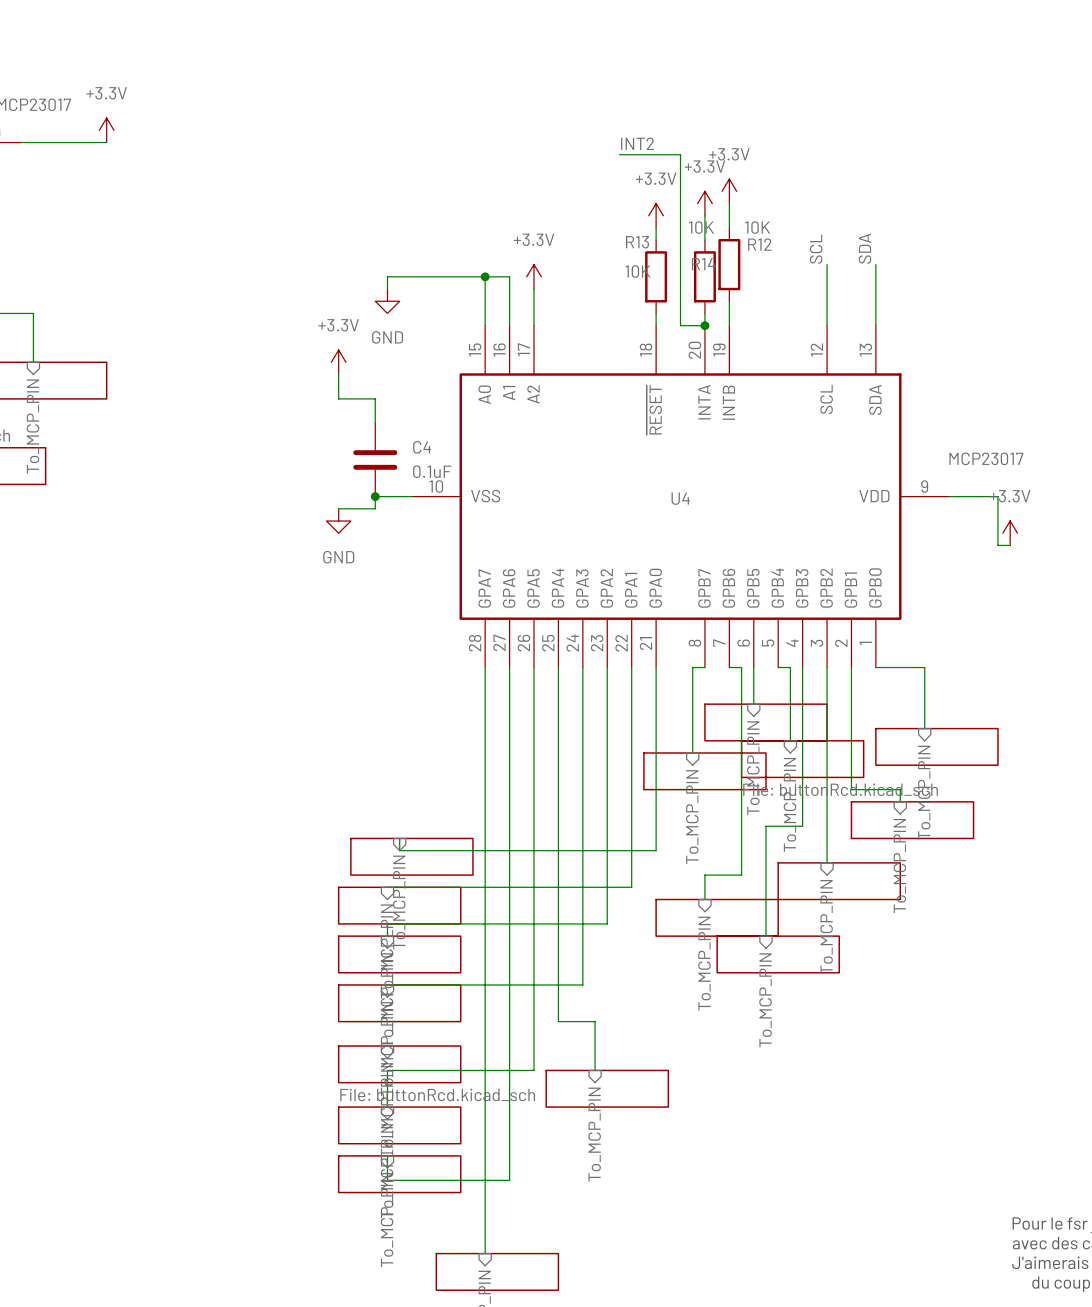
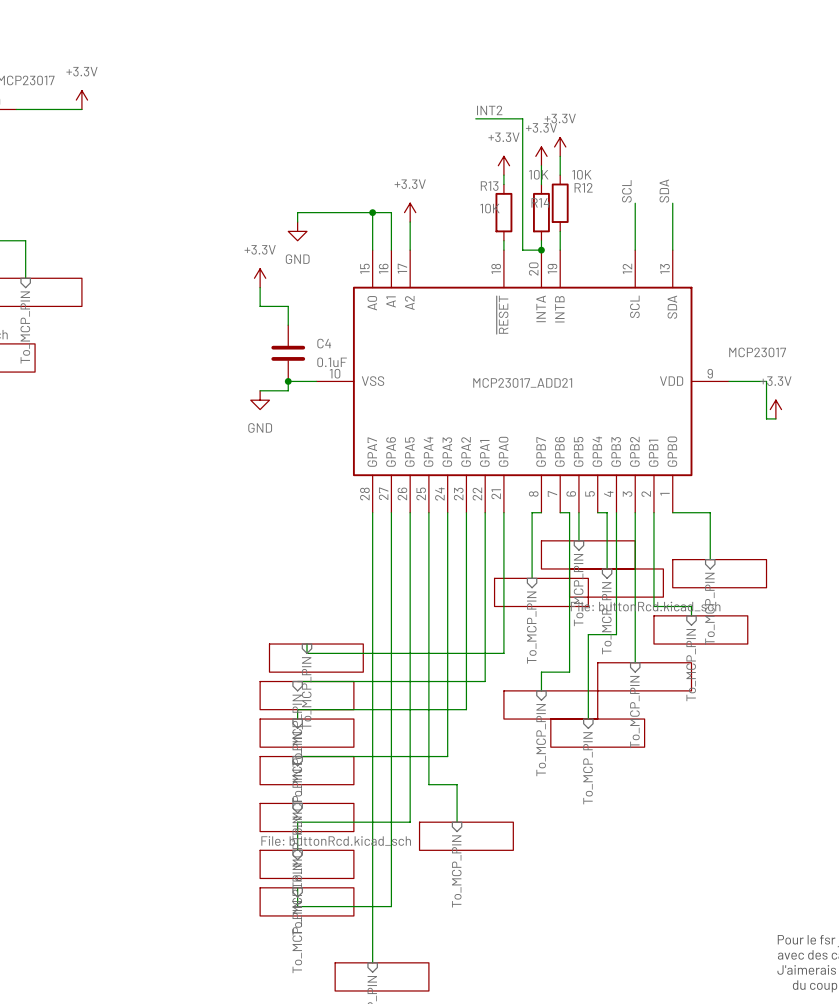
U4 name: U4 (680, 498) -> MCP23017_ADD21 (522, 382)

